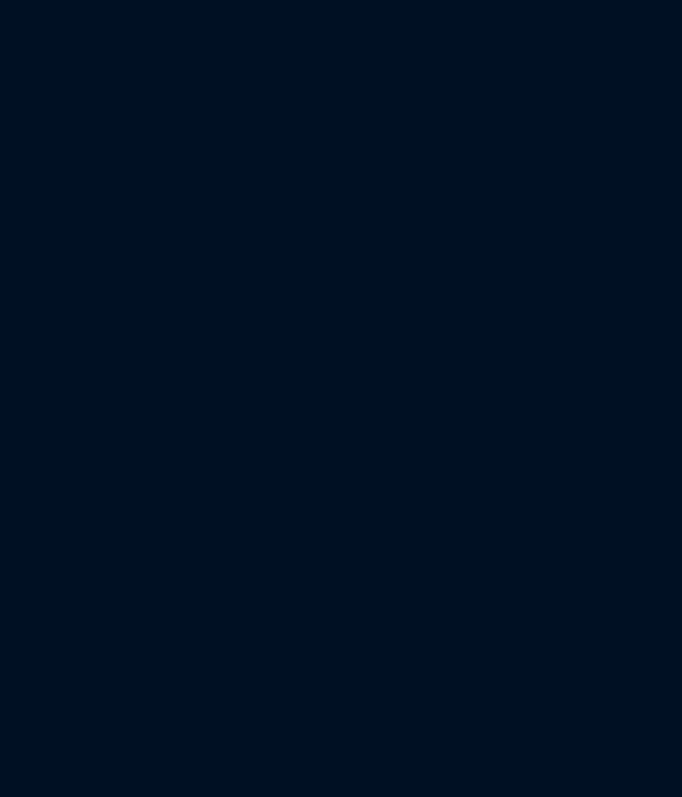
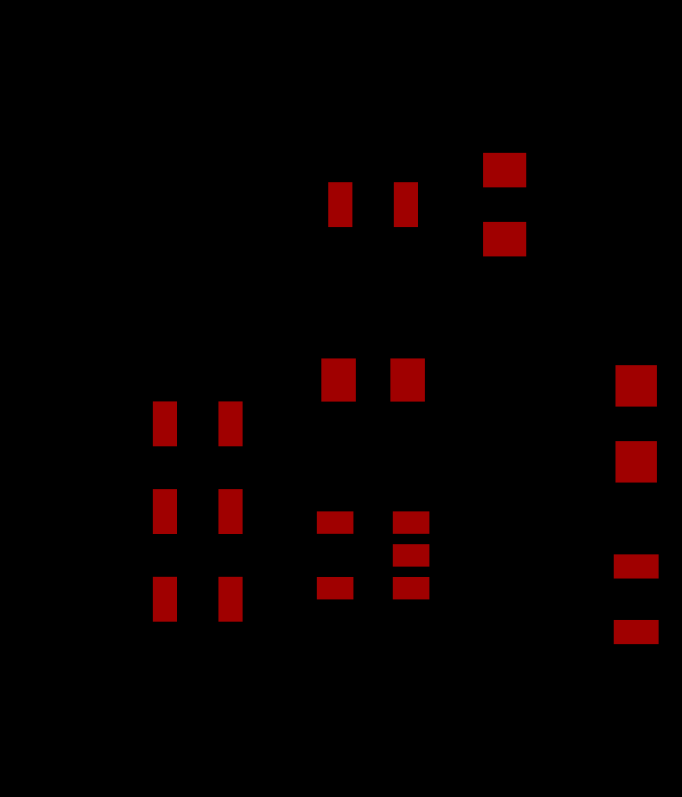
part: none -> (373, 204)
part: none -> (504, 204)
part: none -> (373, 380)
part: none -> (197, 423)
part: none -> (636, 423)
part: none -> (197, 511)
part: none -> (373, 555)
part: none -> (197, 599)
part: none -> (636, 599)

